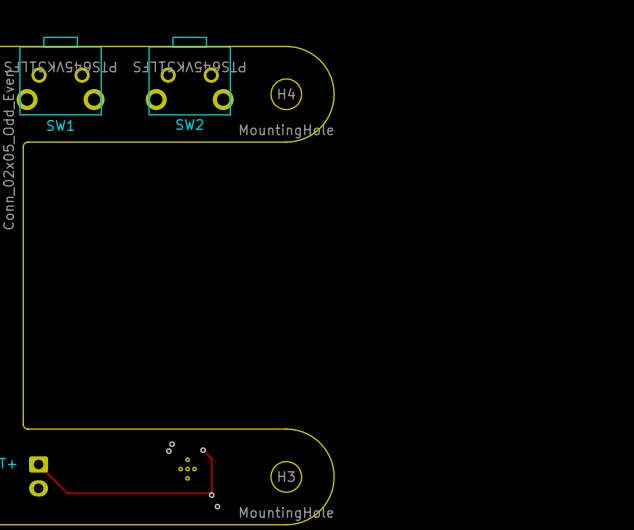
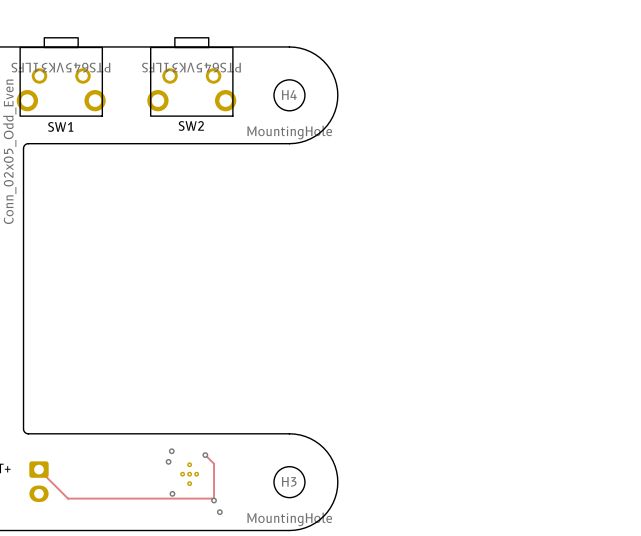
via: (172, 444) -> none
via: none -> (171, 451)
via: (168, 451) -> none
via: none -> (168, 461)
via: none -> (172, 493)

